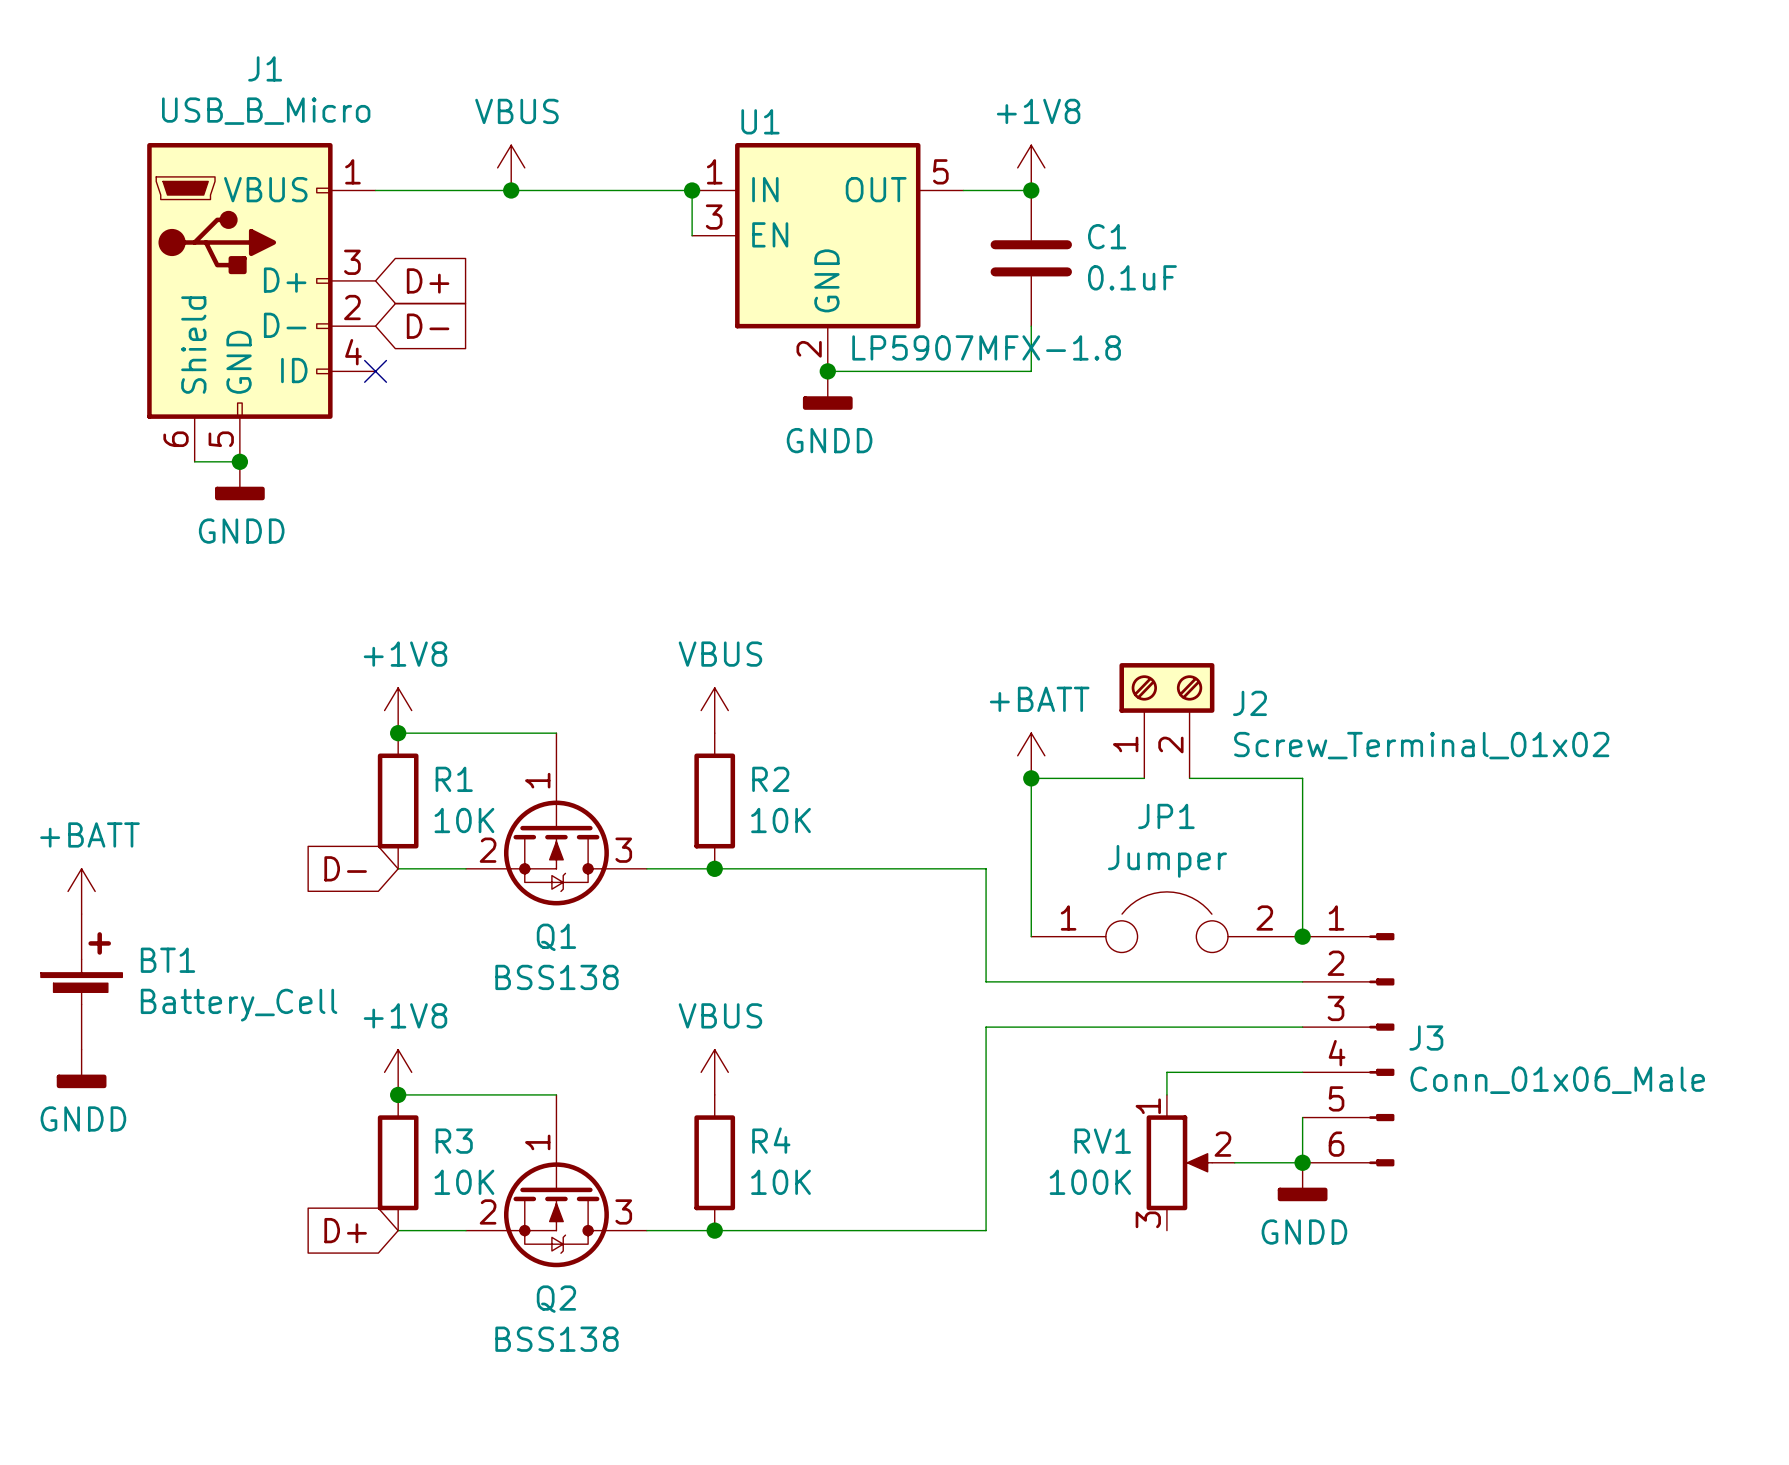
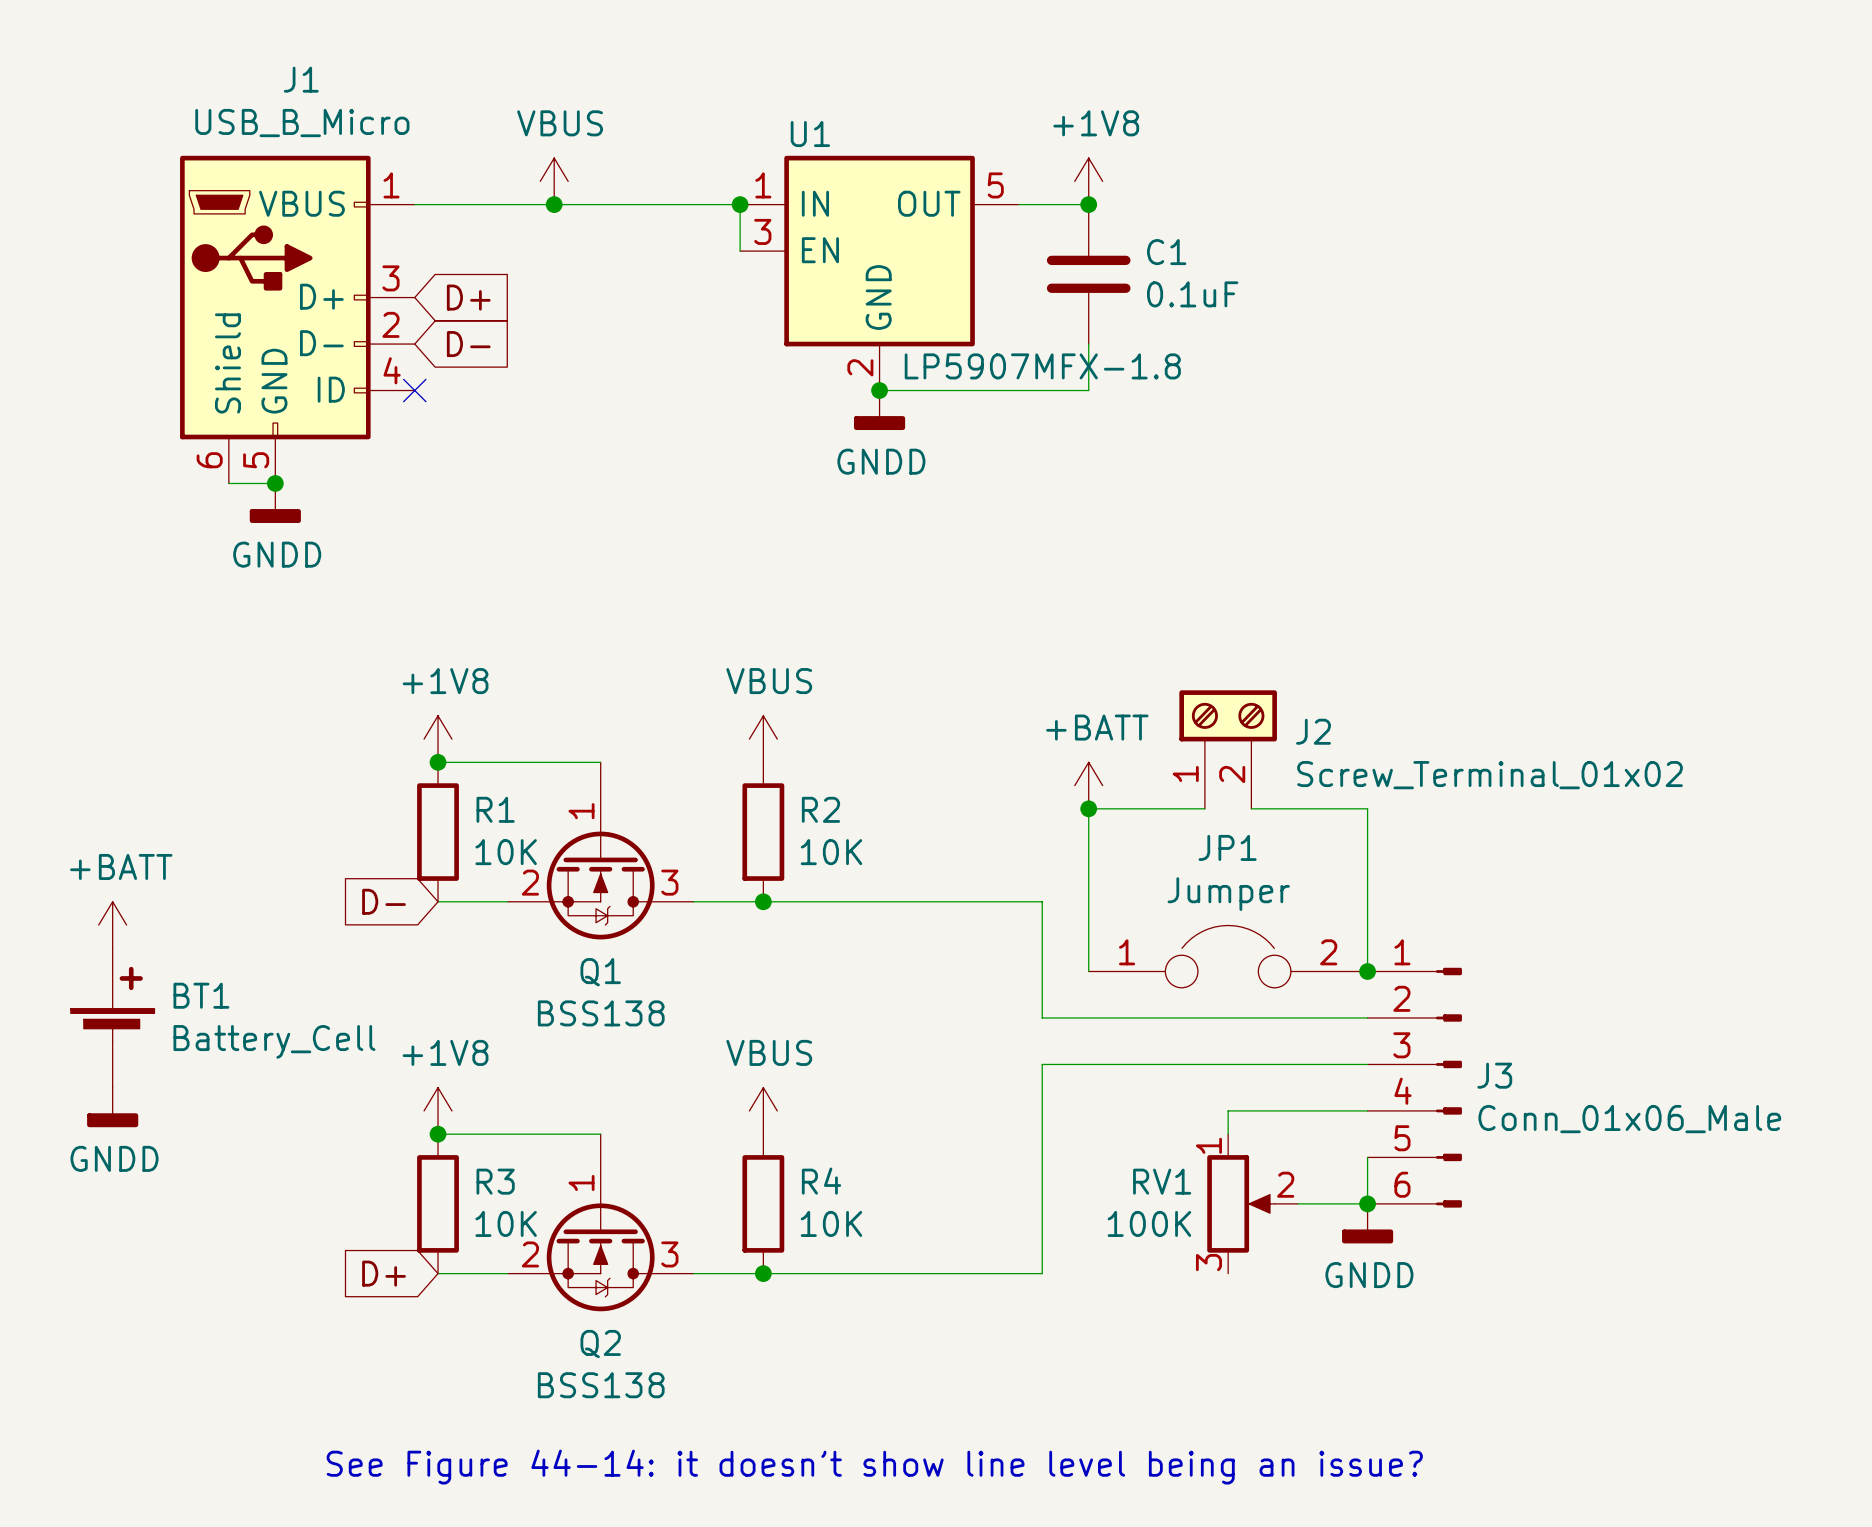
text: none -> See Figure 44-14: it doesn’t show line level being an issue? (874, 1467)

